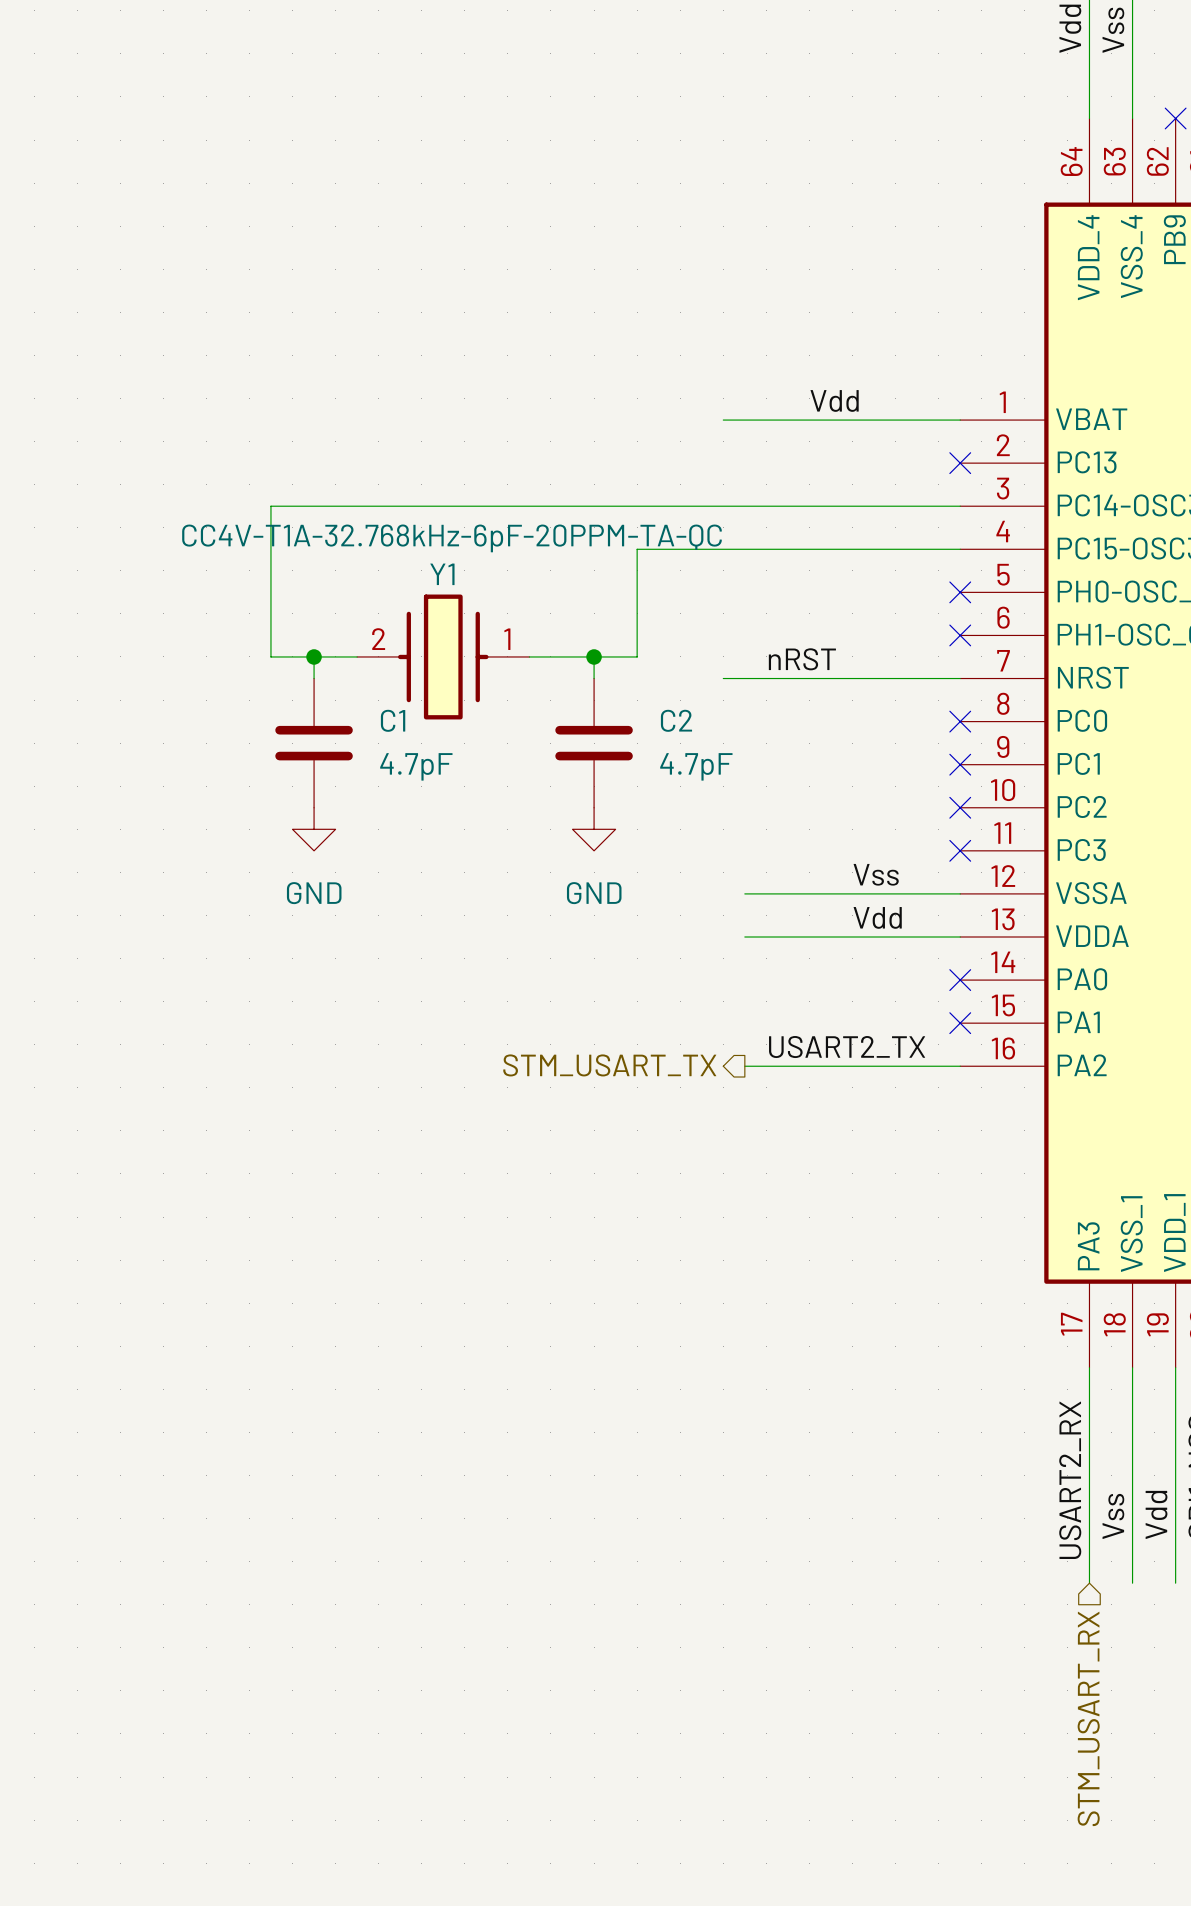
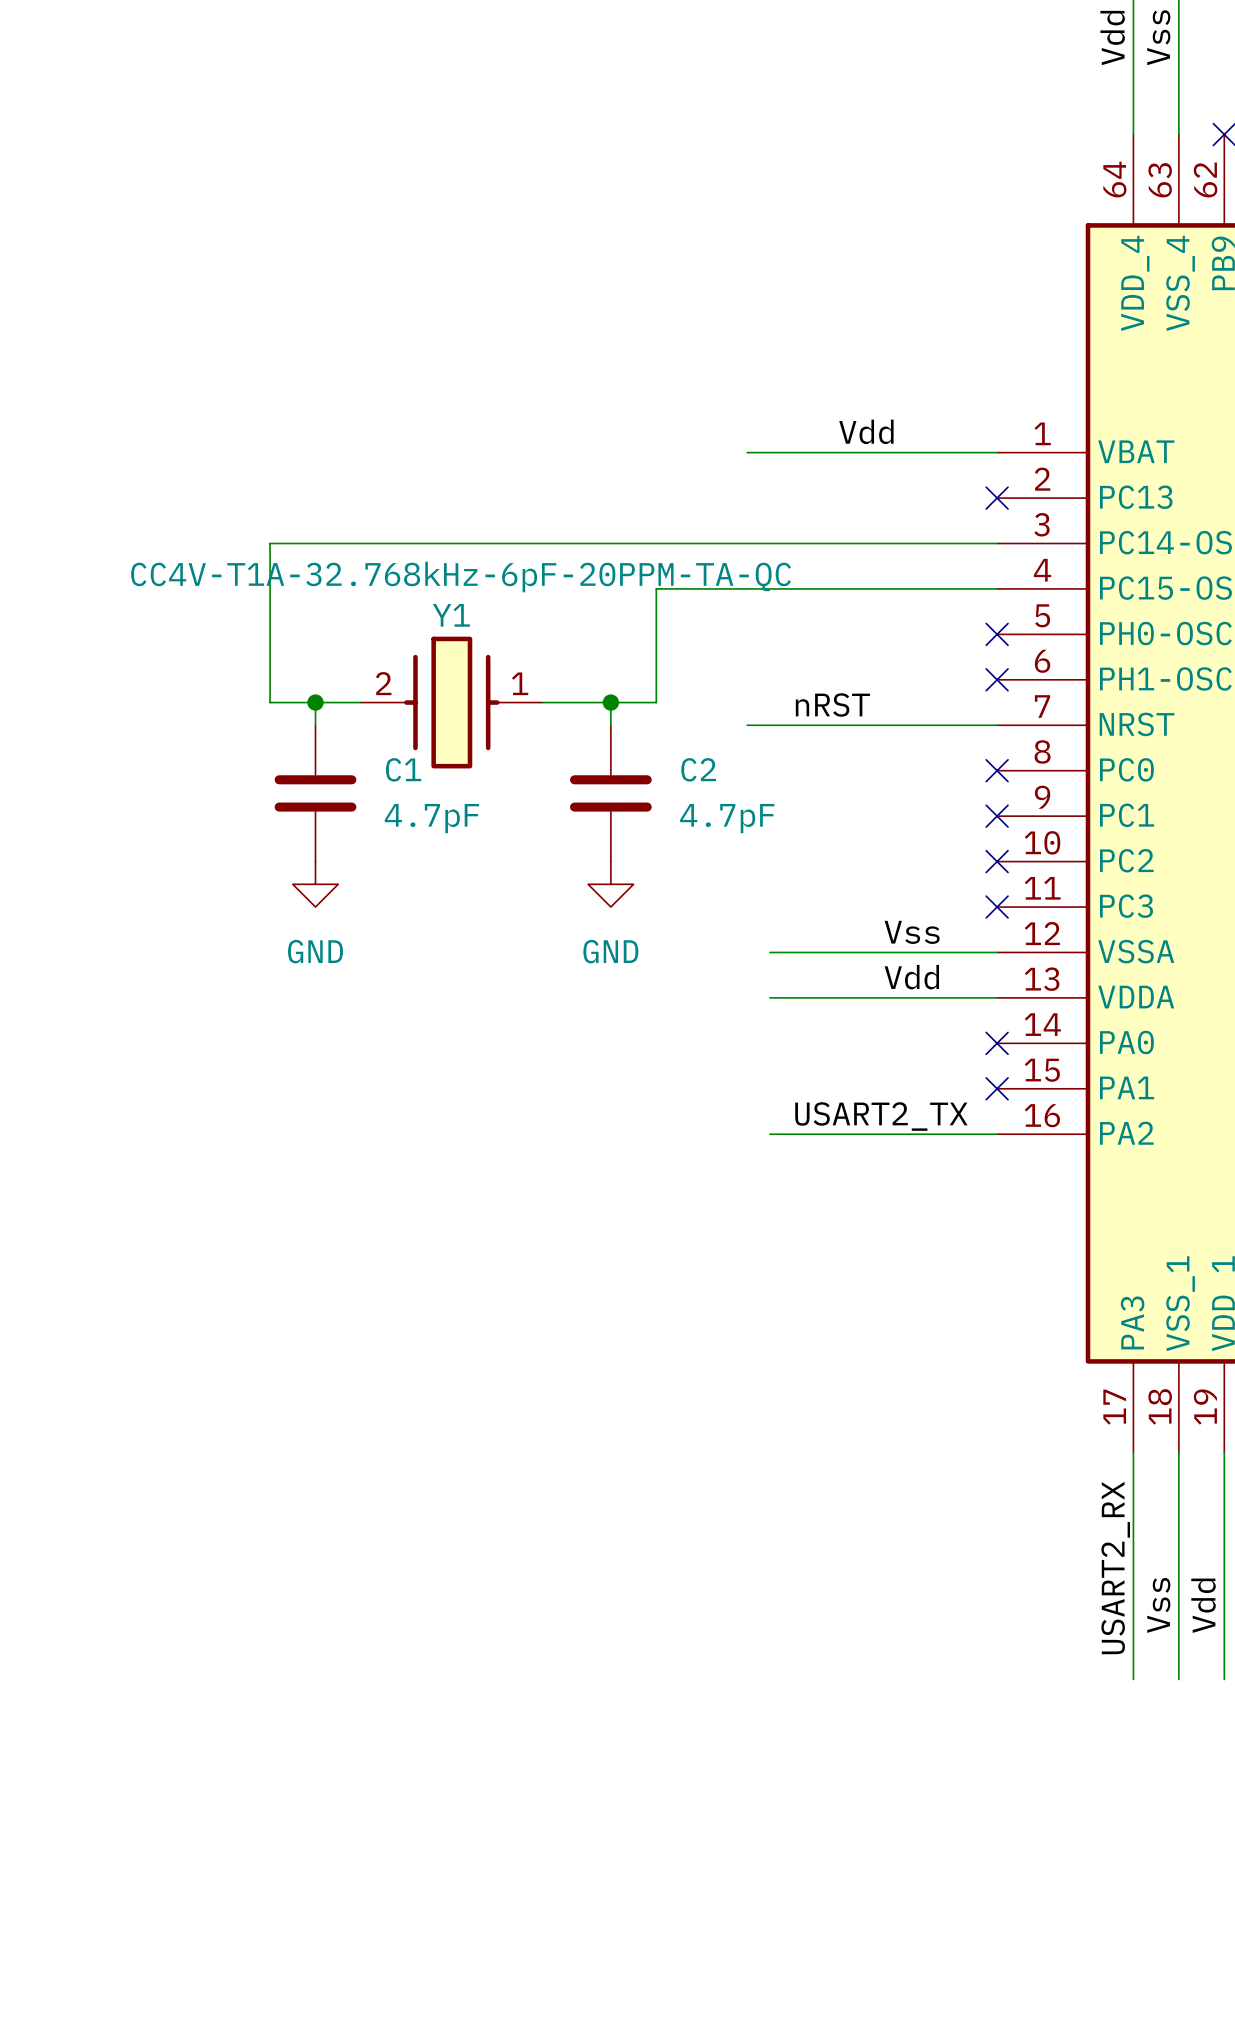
hierarchical label: STM_USART_TX (609, 1065) -> none
hierarchical label: STM_USART_RX (1088, 1718) -> none

